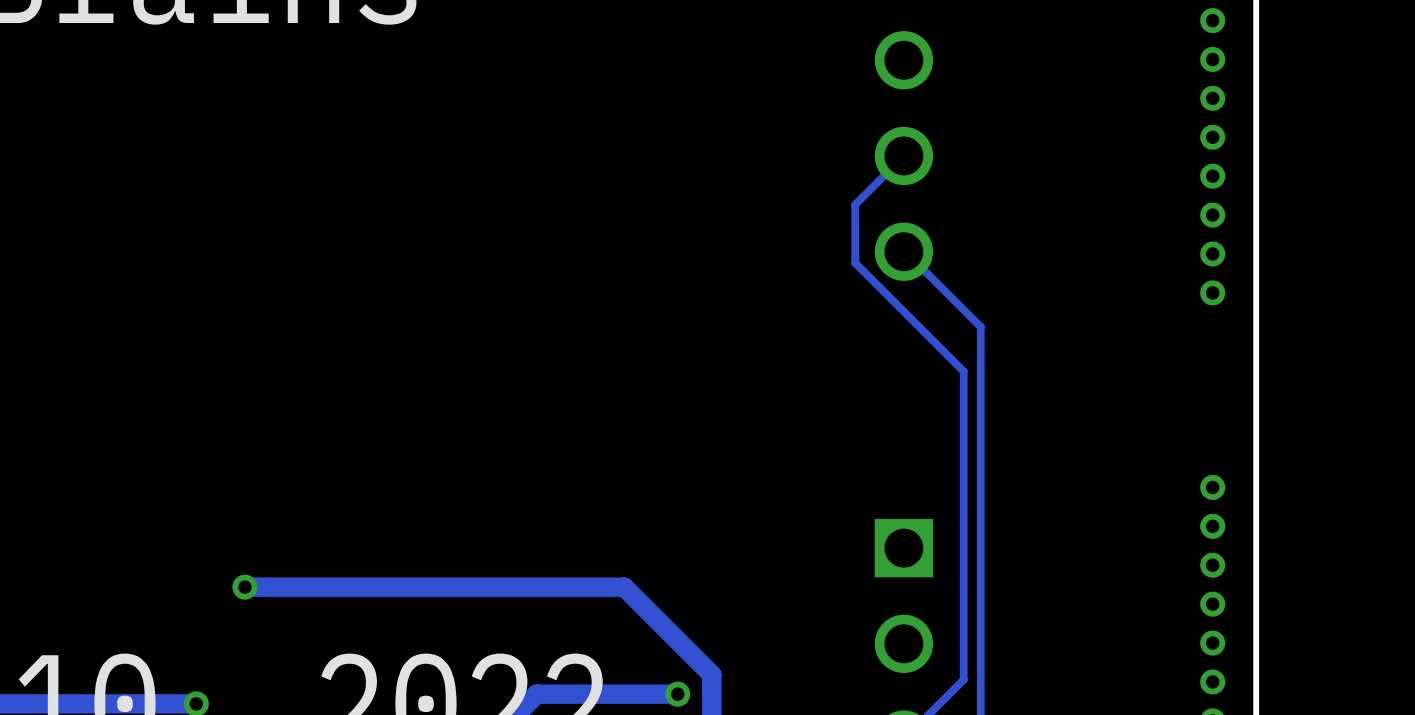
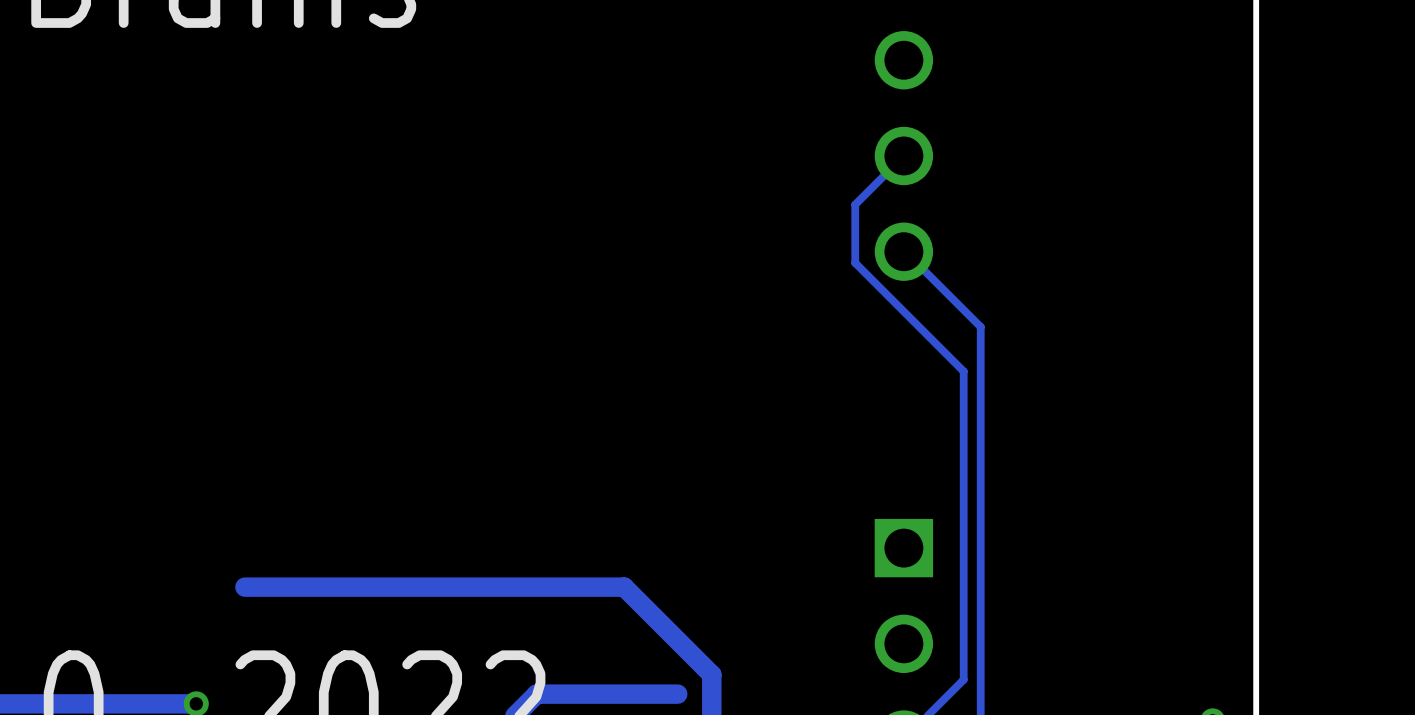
via: (1212, 20) -> none
via: (1212, 59) -> none
via: (1212, 98) -> none
via: (1212, 137) -> none
via: (1212, 176) -> none
via: (1212, 215) -> none
via: (1212, 254) -> none
via: (1212, 292) -> none
via: (1212, 487) -> none
via: (1212, 526) -> none
via: (1212, 565) -> none
via: (244, 587) -> none
via: (1212, 604) -> none
via: (1212, 643) -> none
via: (1212, 681) -> none
via: (677, 694) -> none

